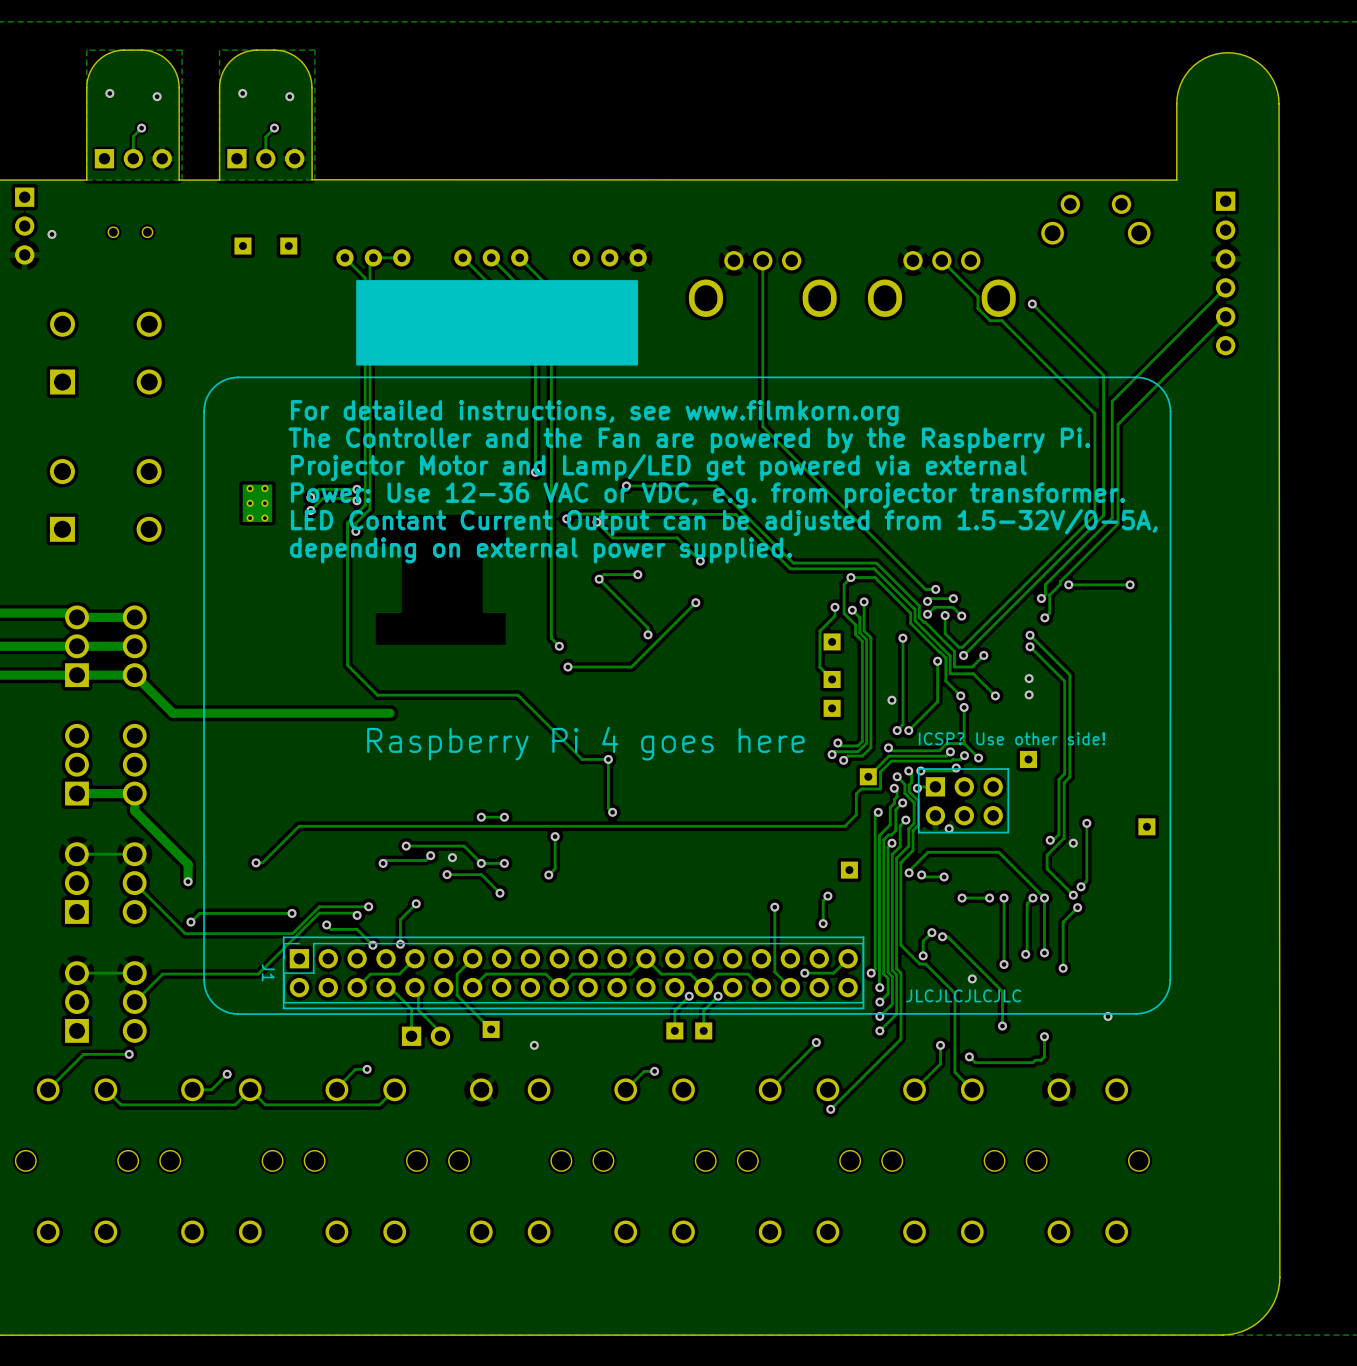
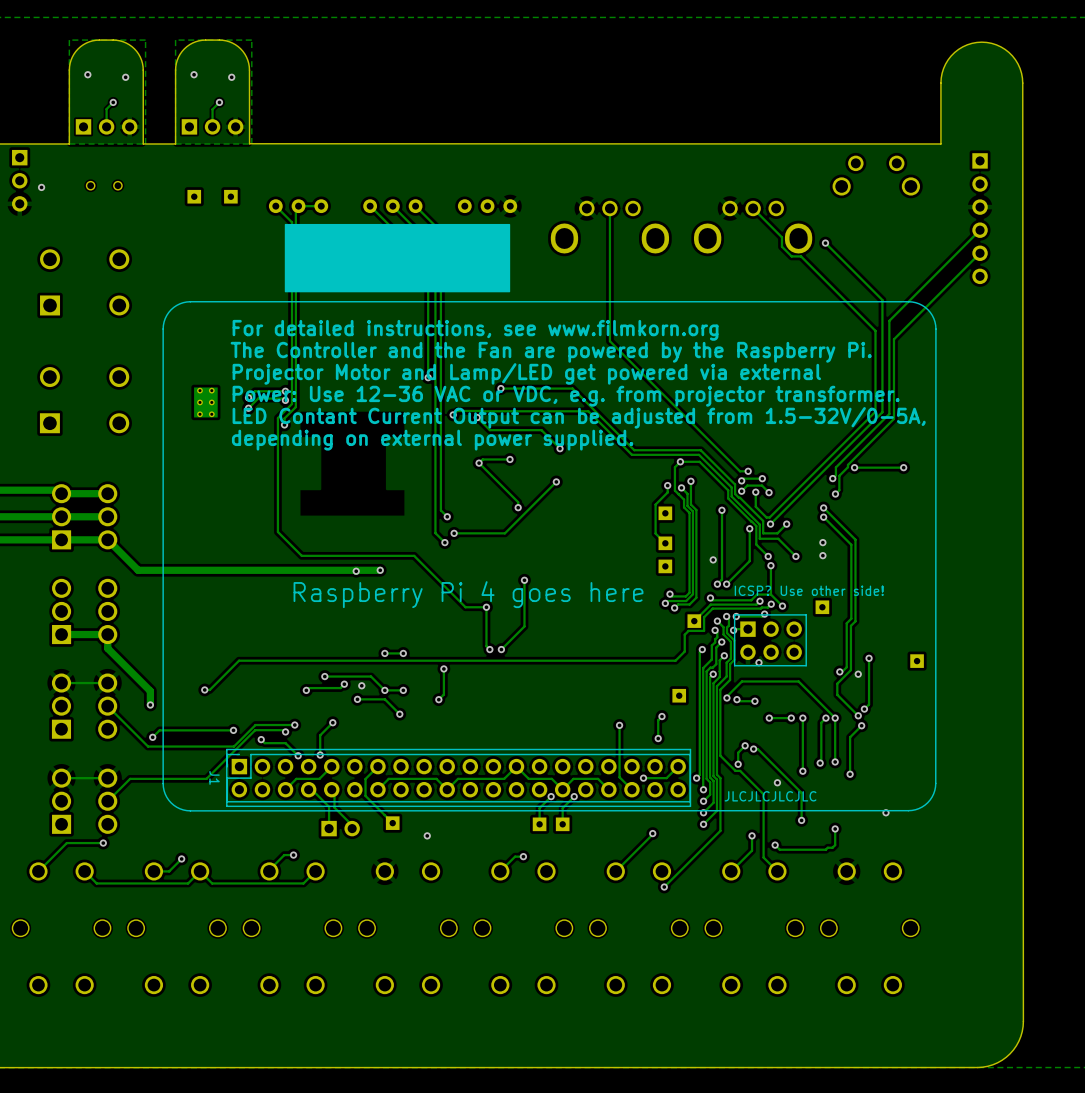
track: none -> (435, 248) (435, 533) (444, 542)
via: none -> (444, 542)
track: none -> (380, 570) (312, 570)
via: none -> (380, 570)
via: none -> (356, 571)
track: none -> (524, 580) (524, 626) (501, 649)
via: none -> (524, 580)
via: none -> (501, 649)

